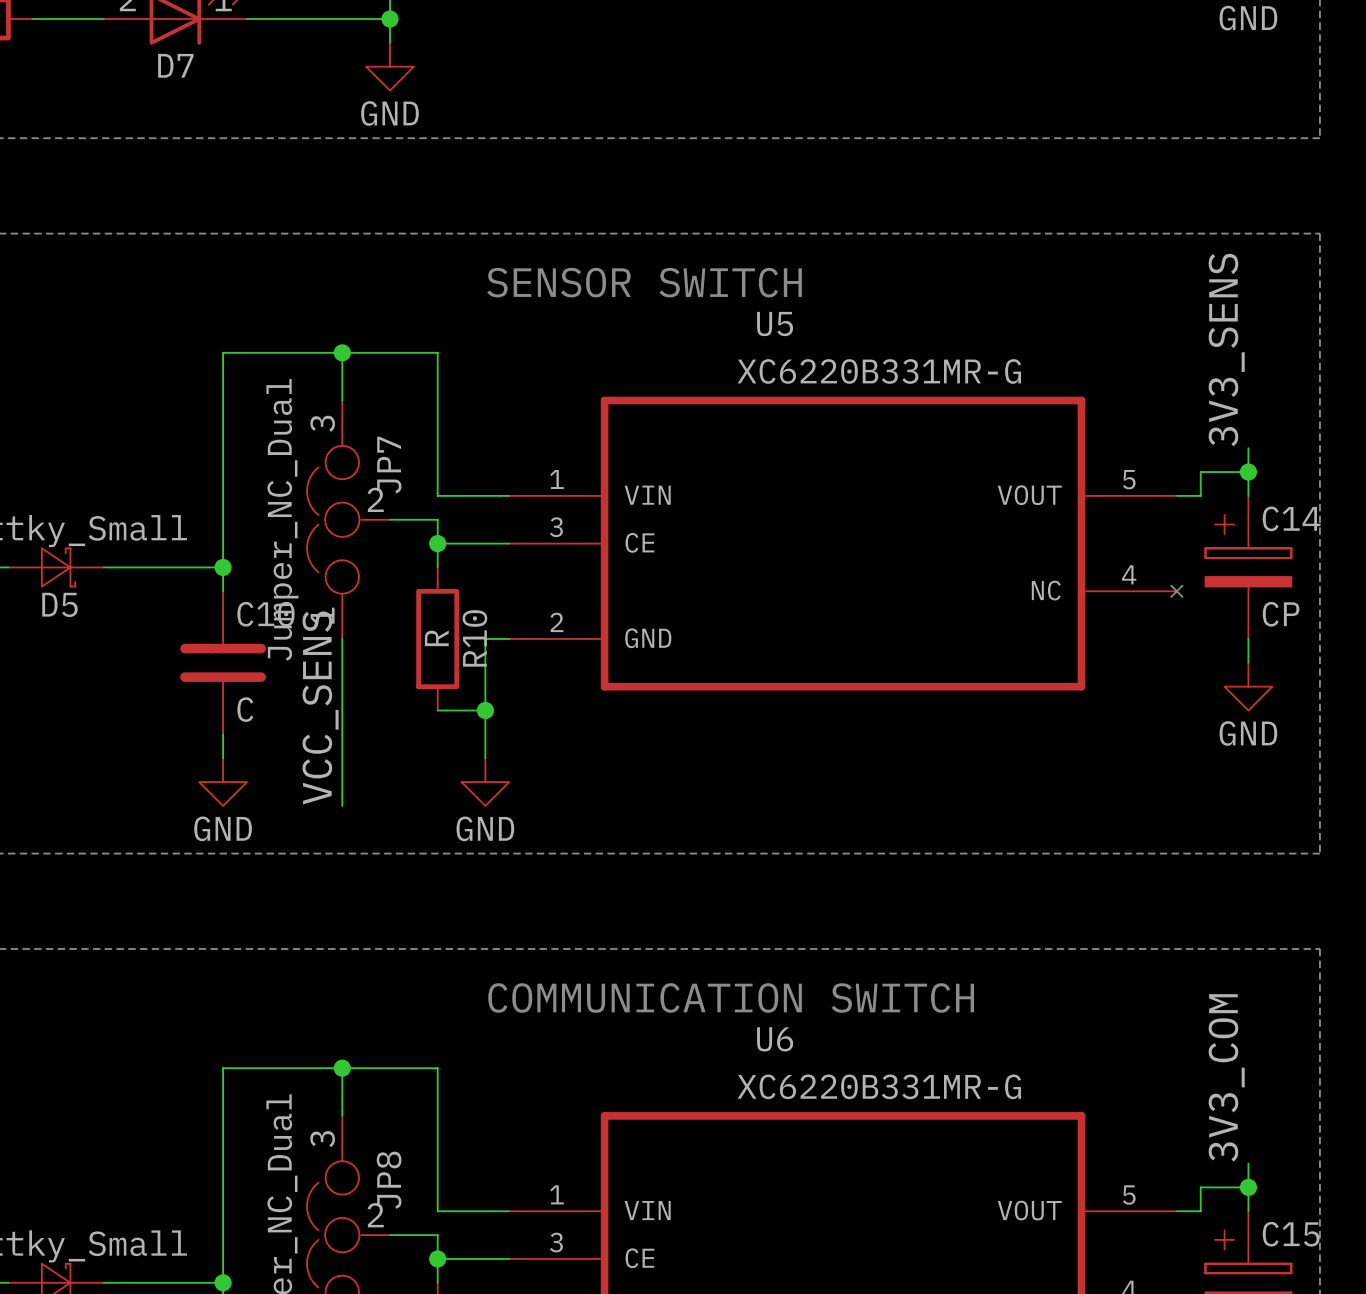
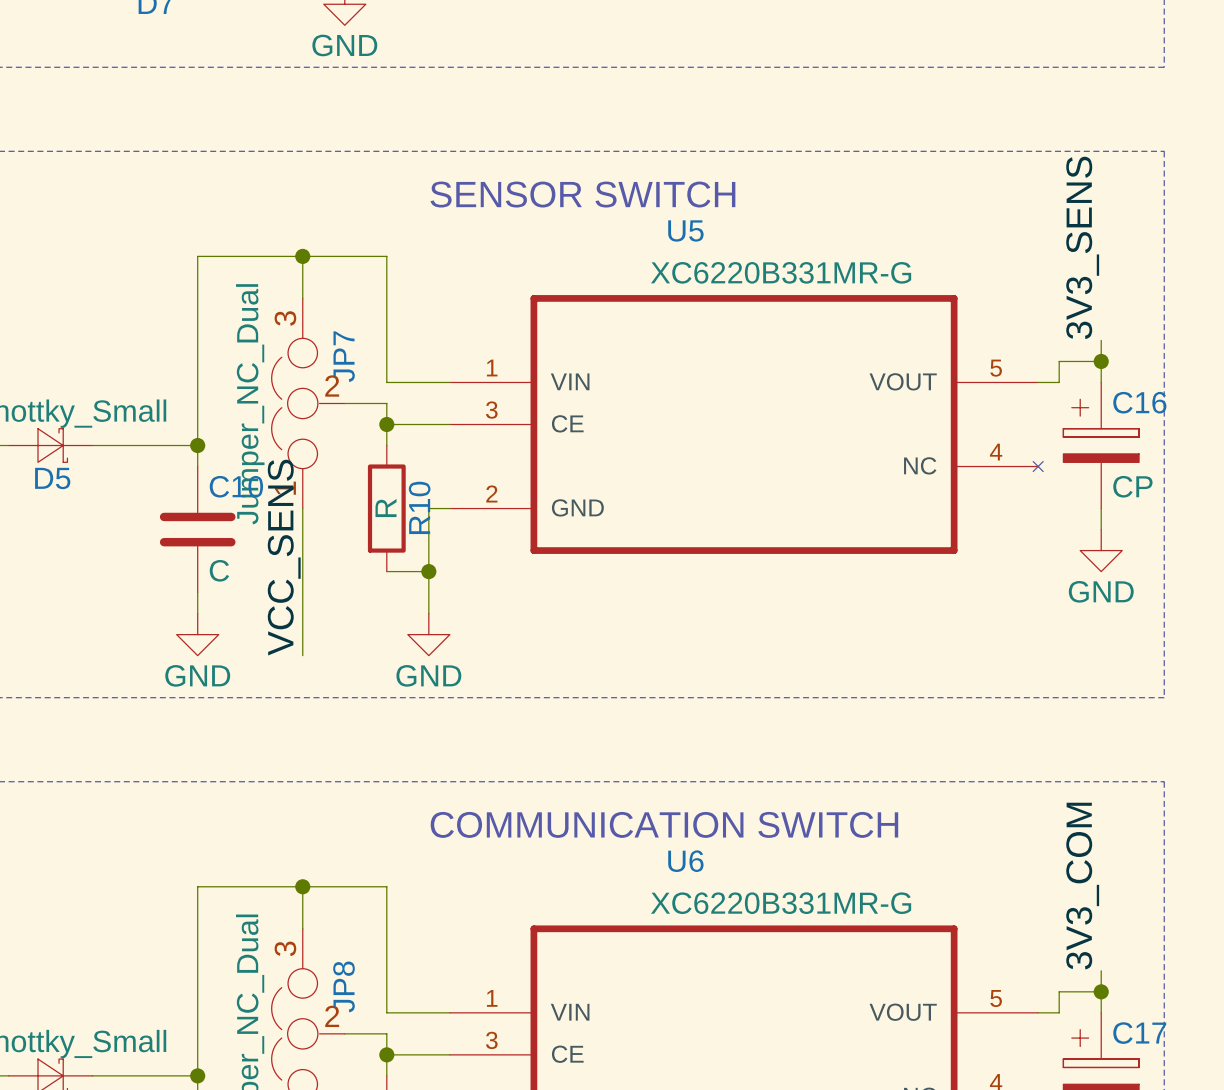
C14 name: C14 (1291, 518) -> C16 (1139, 402)
C15 name: C15 (1291, 1234) -> C17 (1139, 1033)

